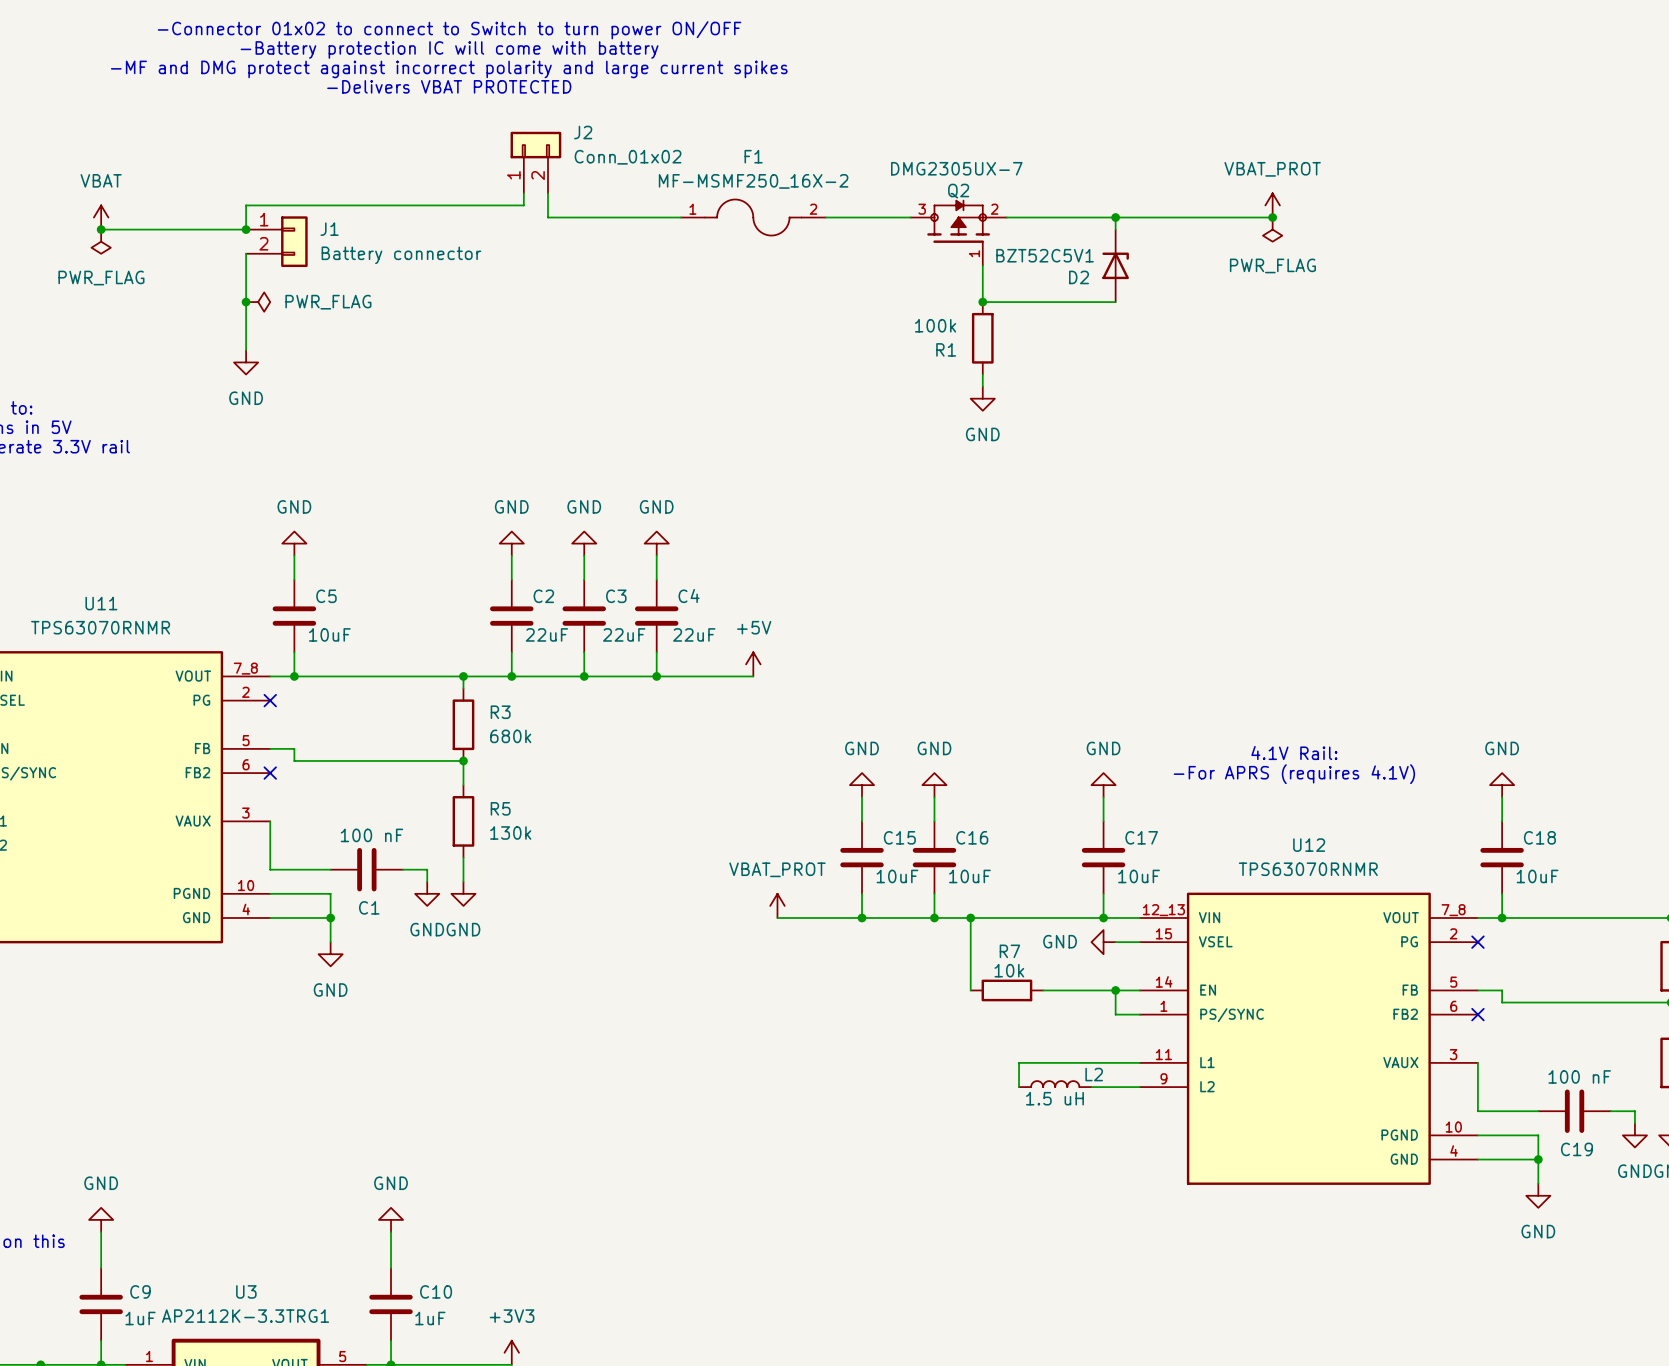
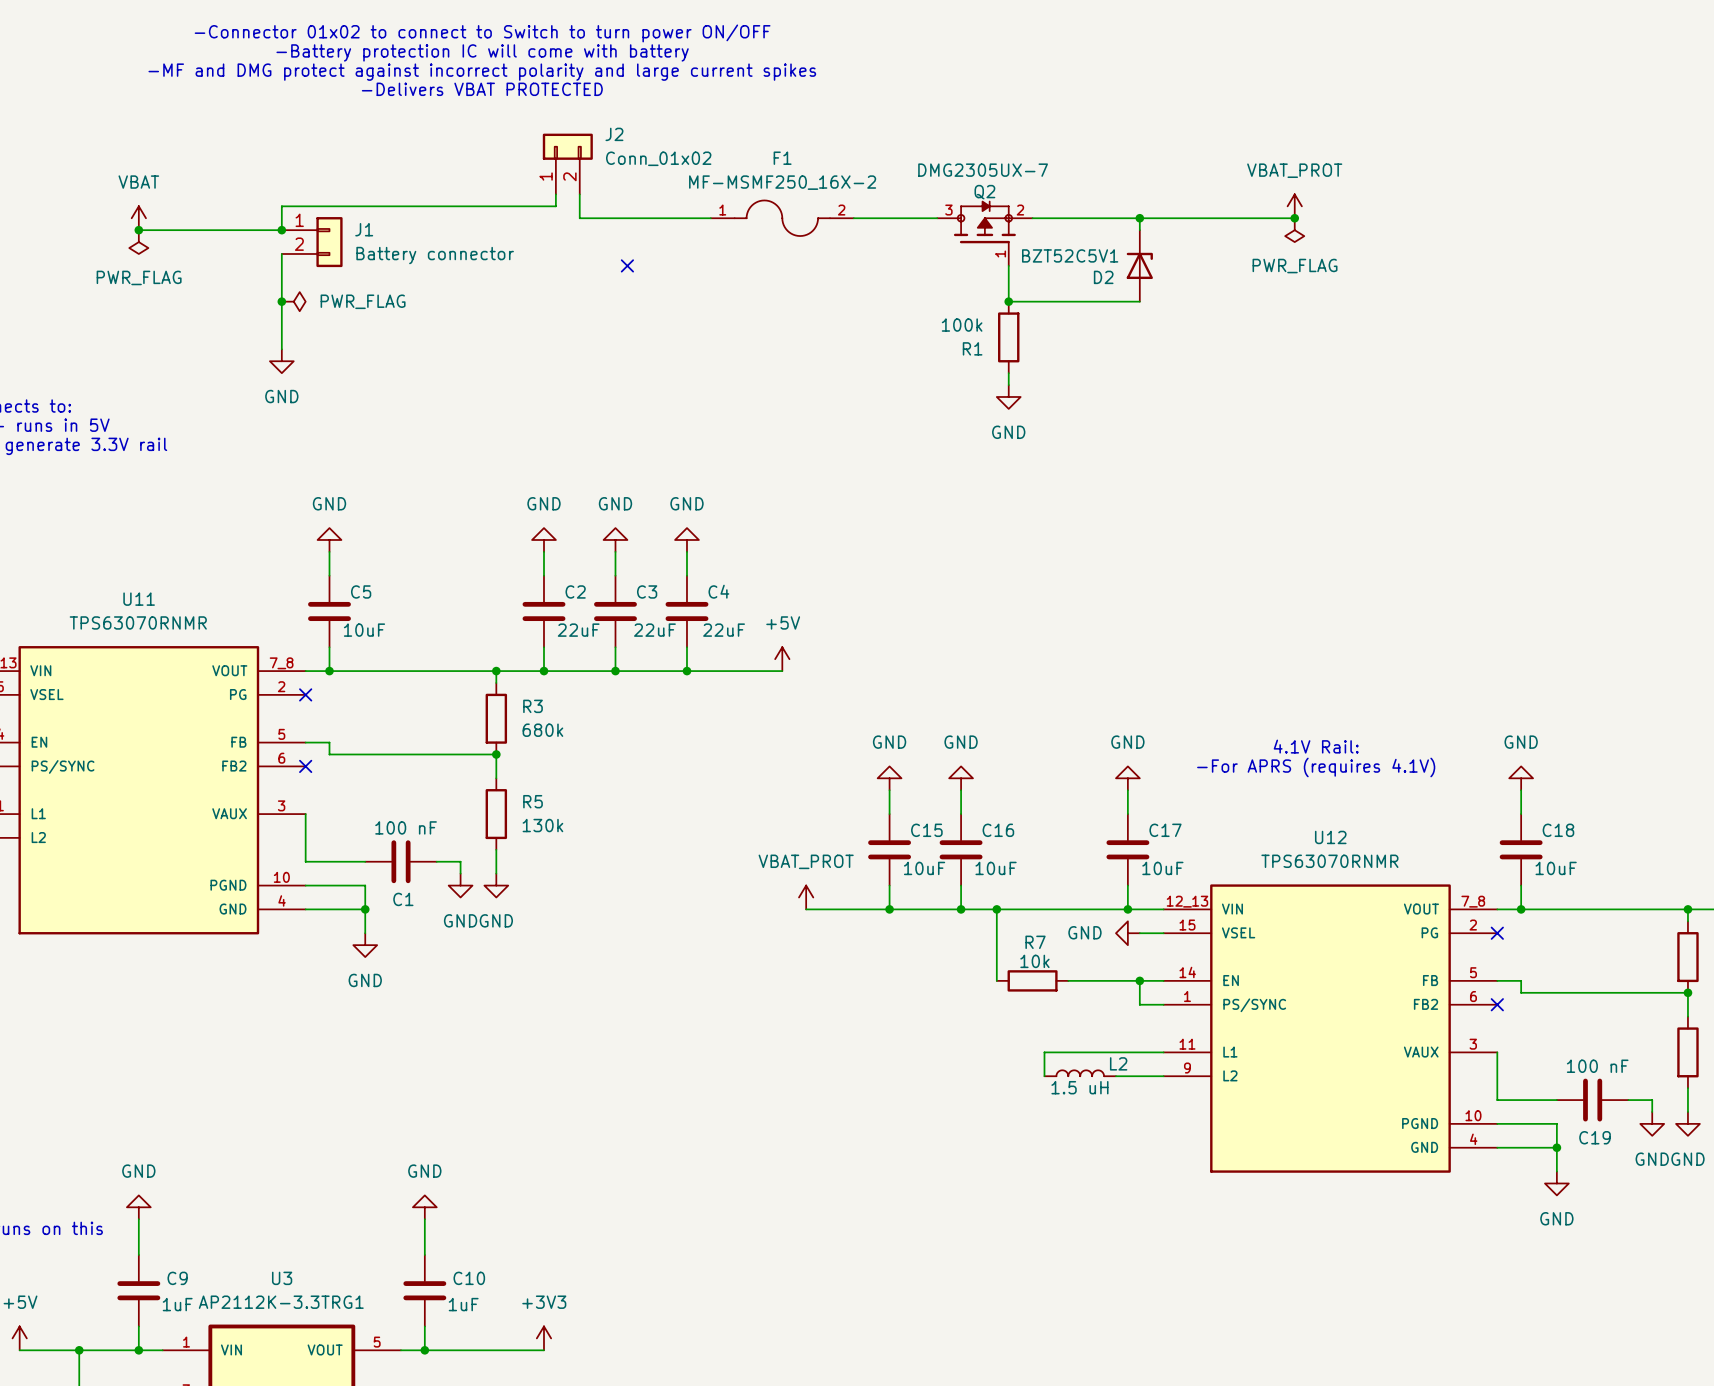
no-connect mark: none -> (627, 265)

